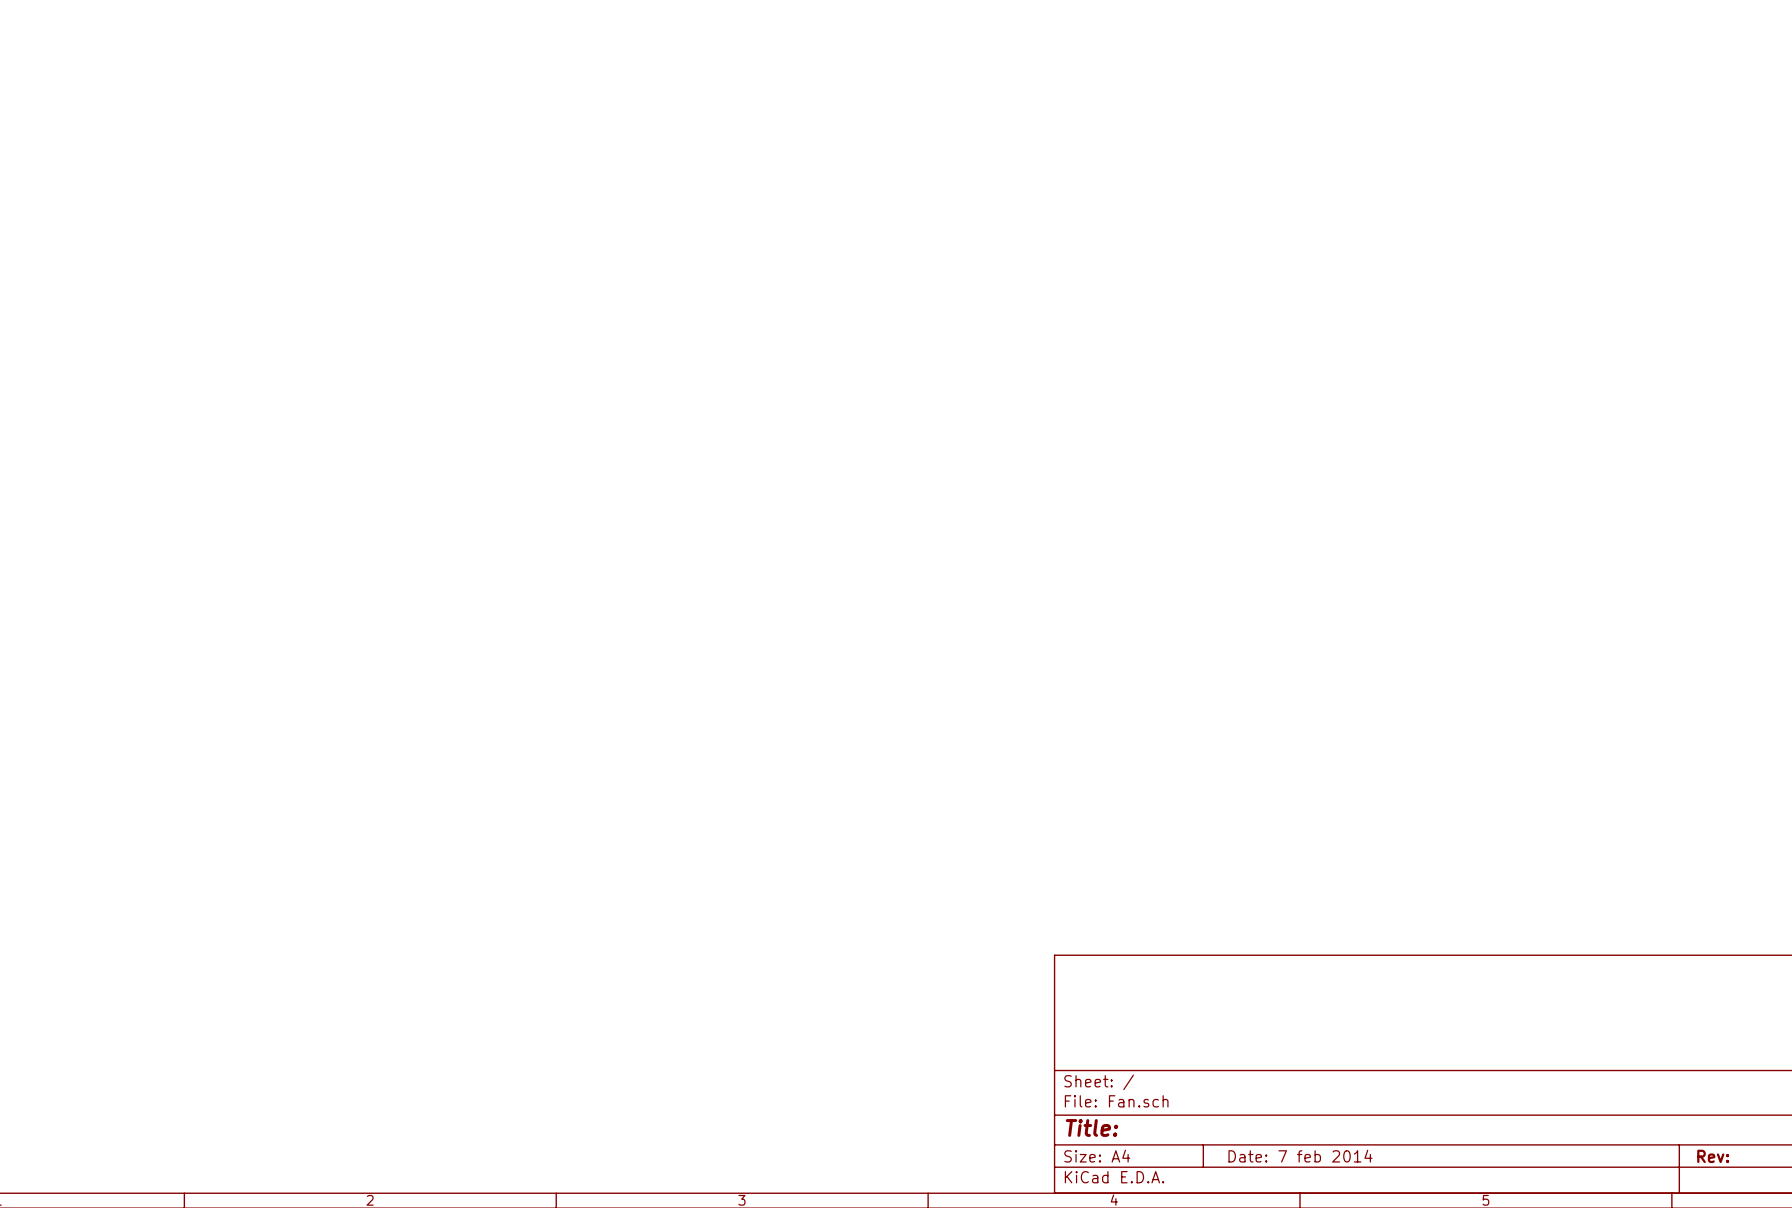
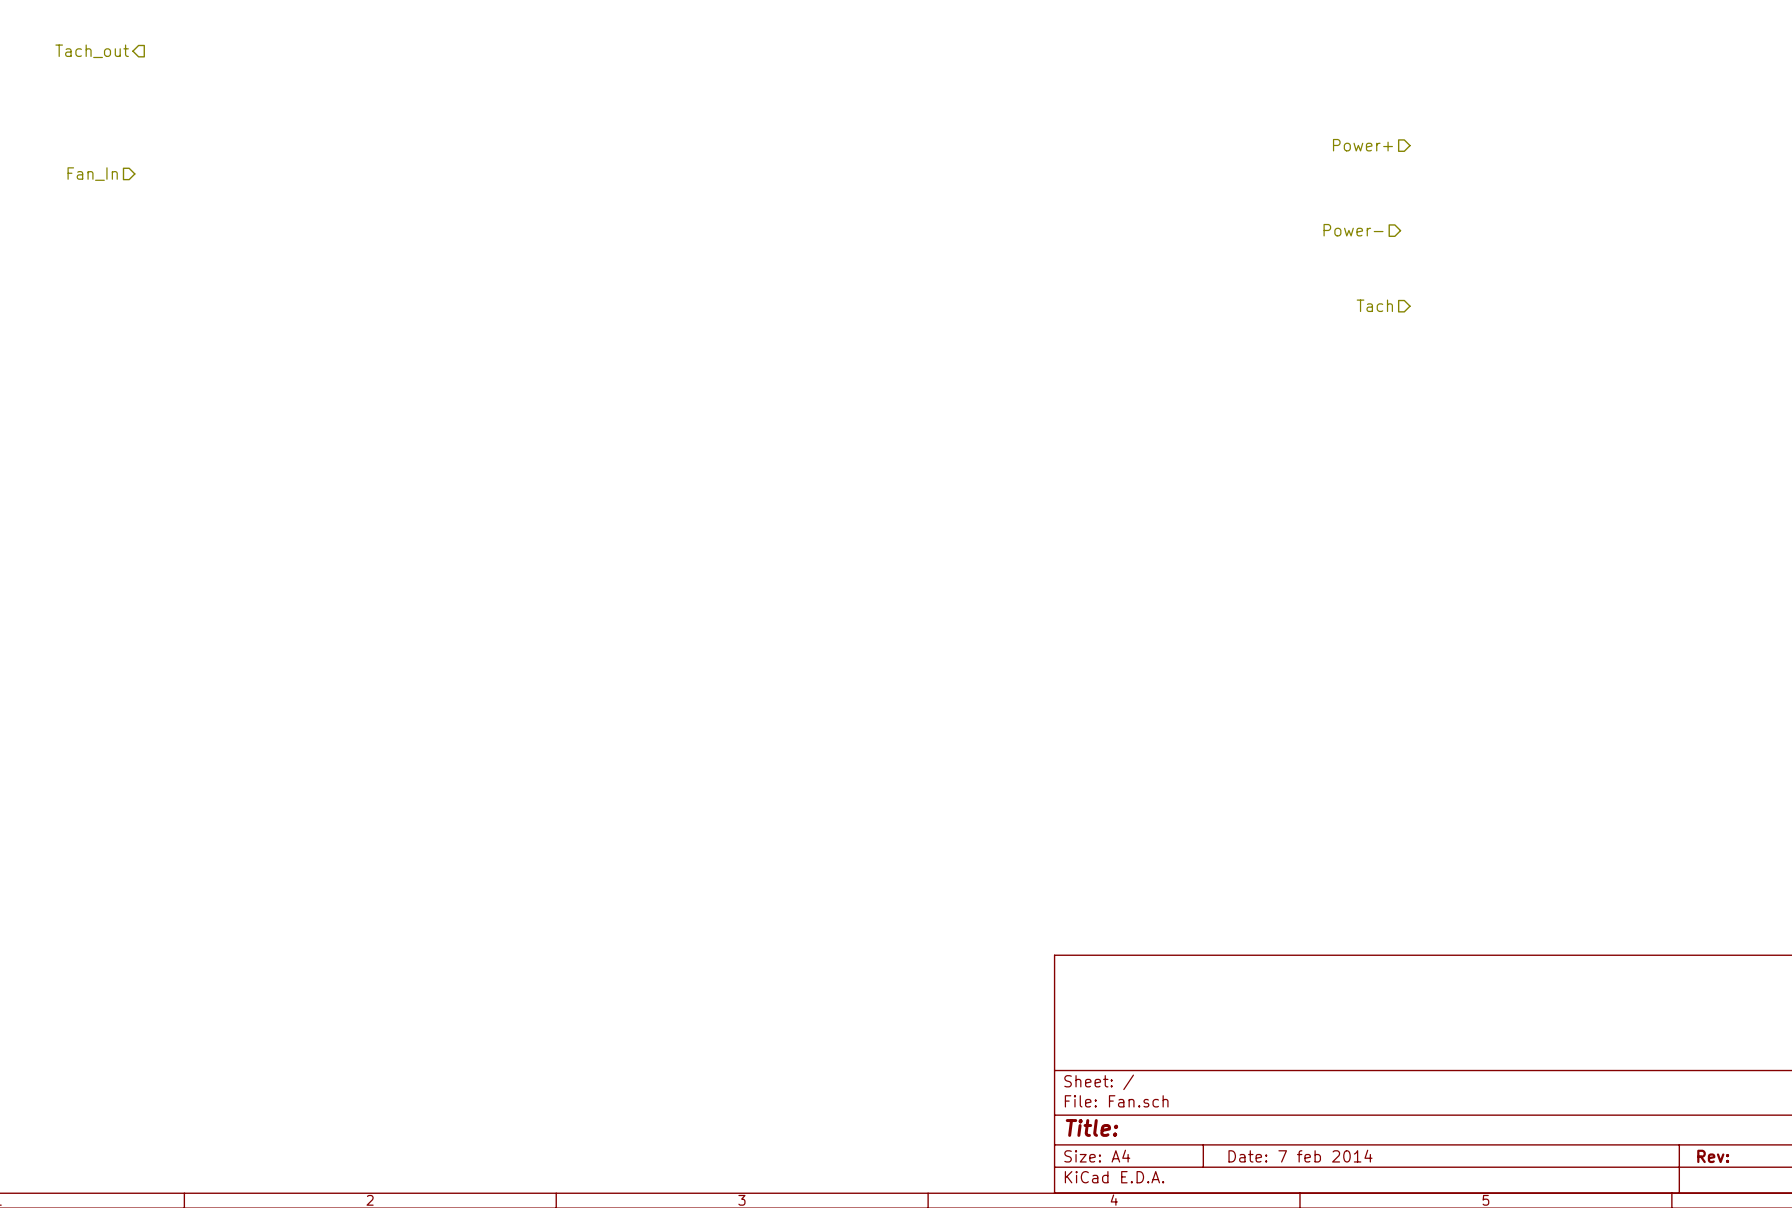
hierarchical label: none -> Tach_out (92, 51)
hierarchical label: none -> Power+ (1362, 145)
hierarchical label: none -> Fan_In (92, 174)
hierarchical label: none -> Power- (1353, 230)
hierarchical label: none -> Tach (1374, 305)

